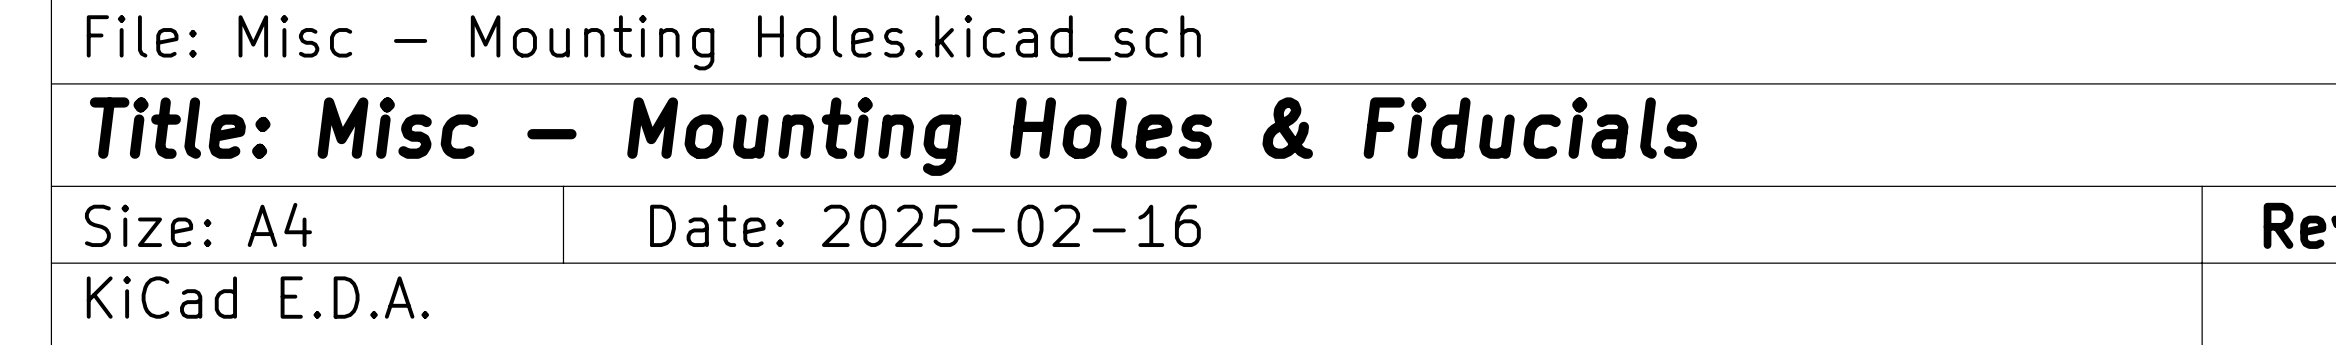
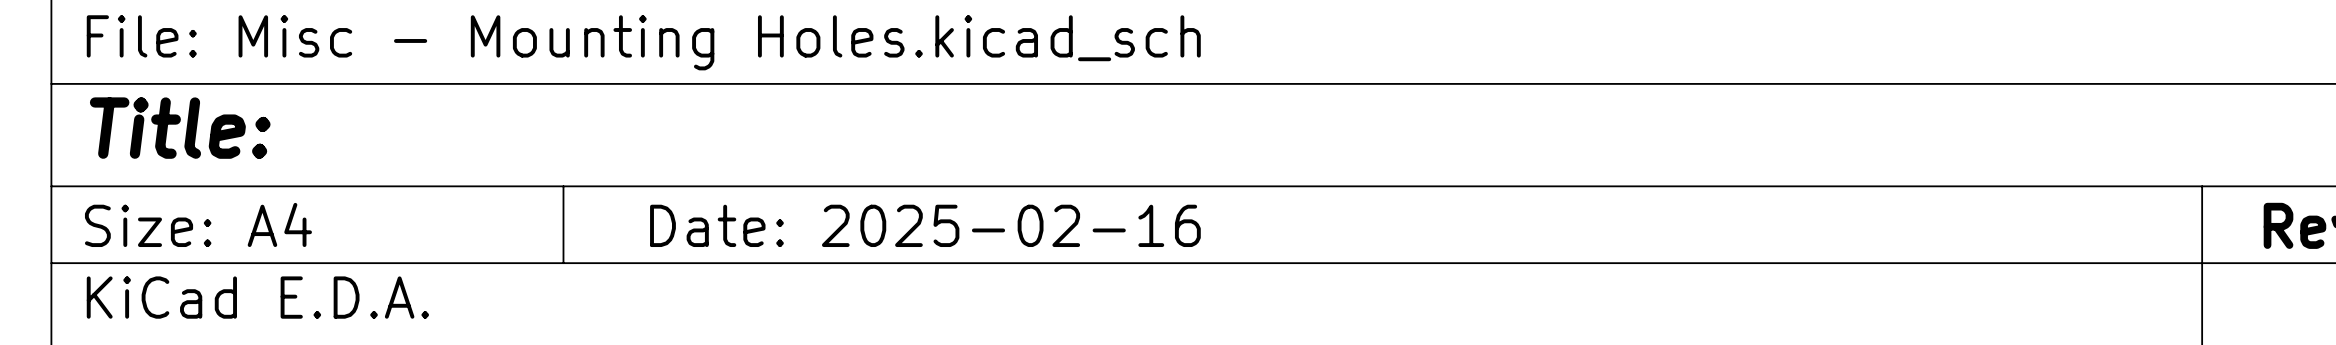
title block: Title: Misc - Mounting Holes & Fiducials (893, 136) -> Title: (180, 128)

